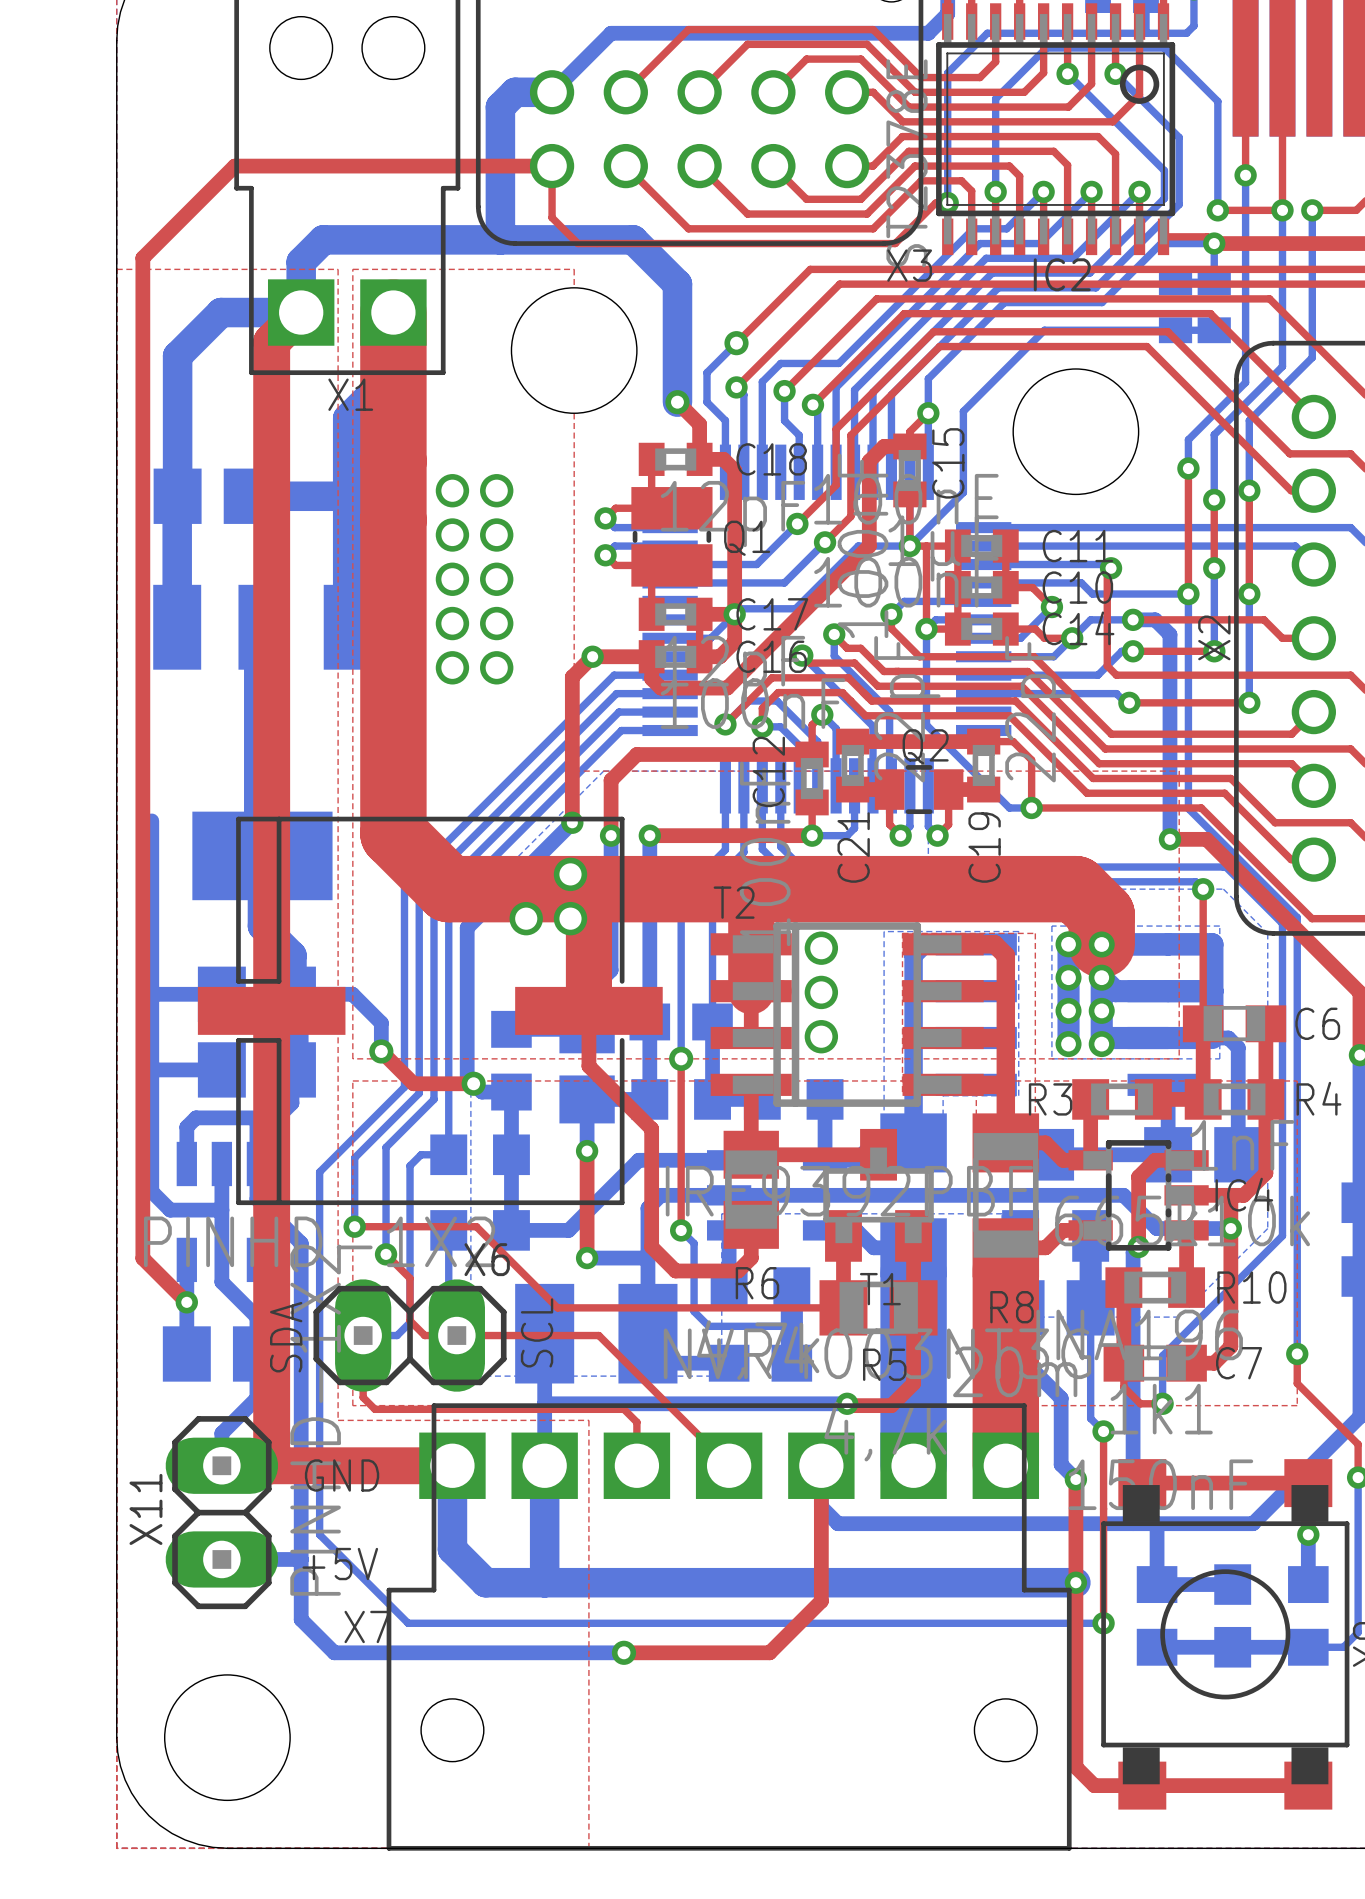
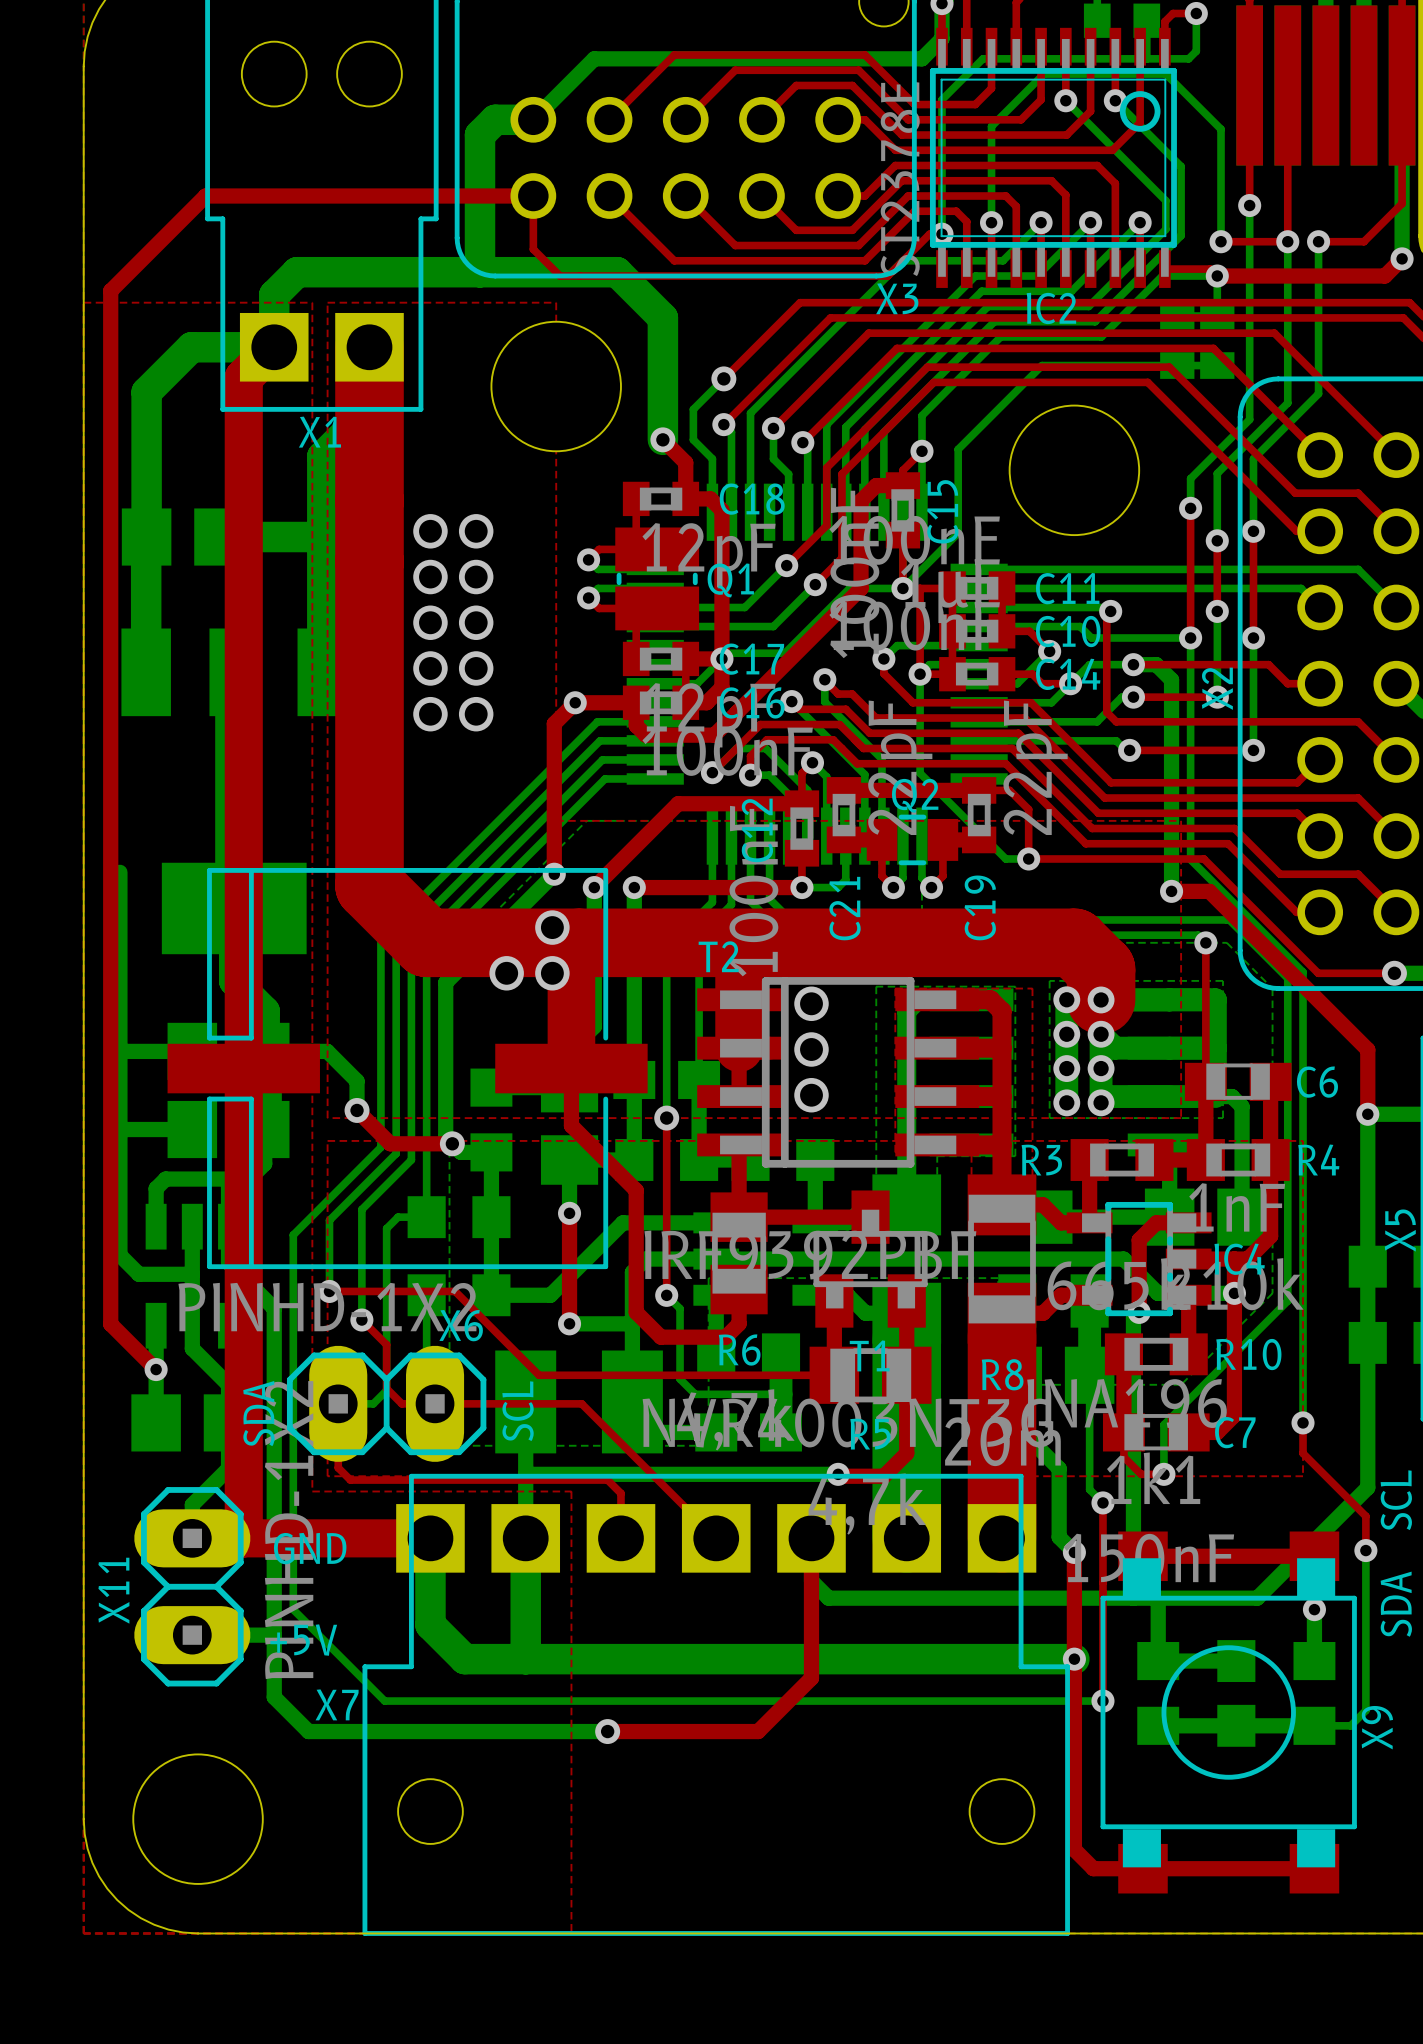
bottom track: (973, 228) (838, 363) (780, 363) (762, 381) -> (968, 260) (902, 260) (750, 413) (750, 418)
top track: (692, 754) (636, 754) (611, 780) (611, 835) -> (678, 803) (594, 887)

